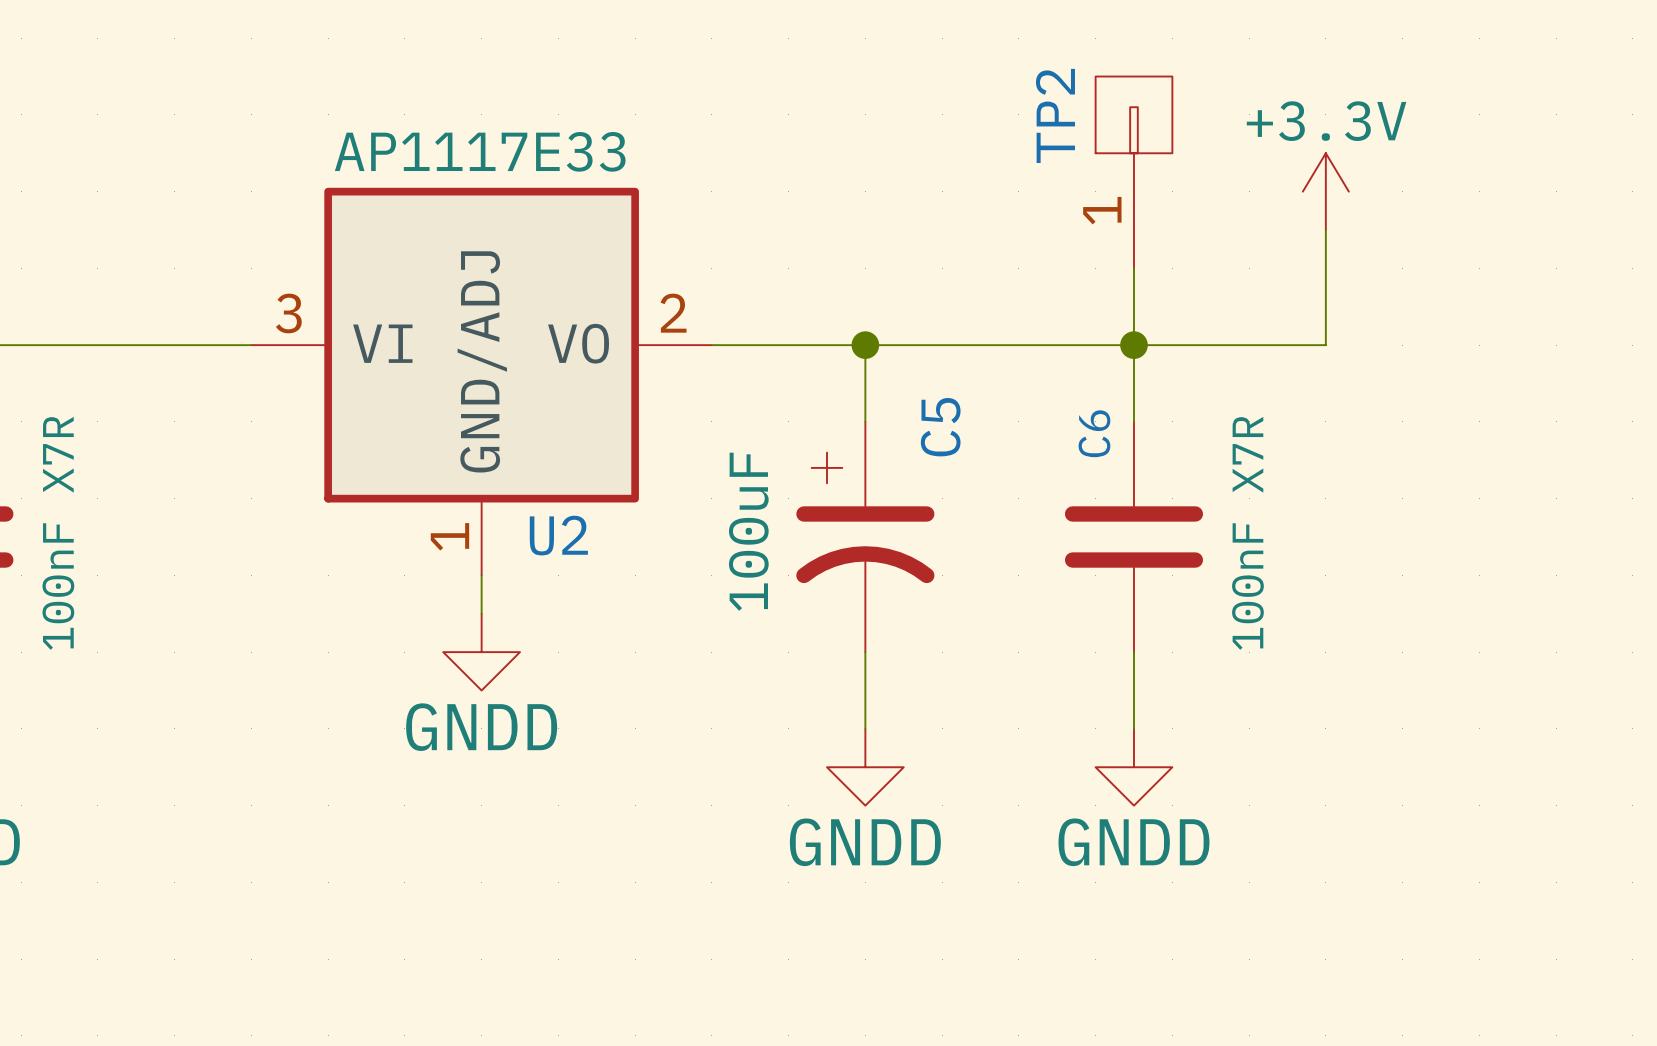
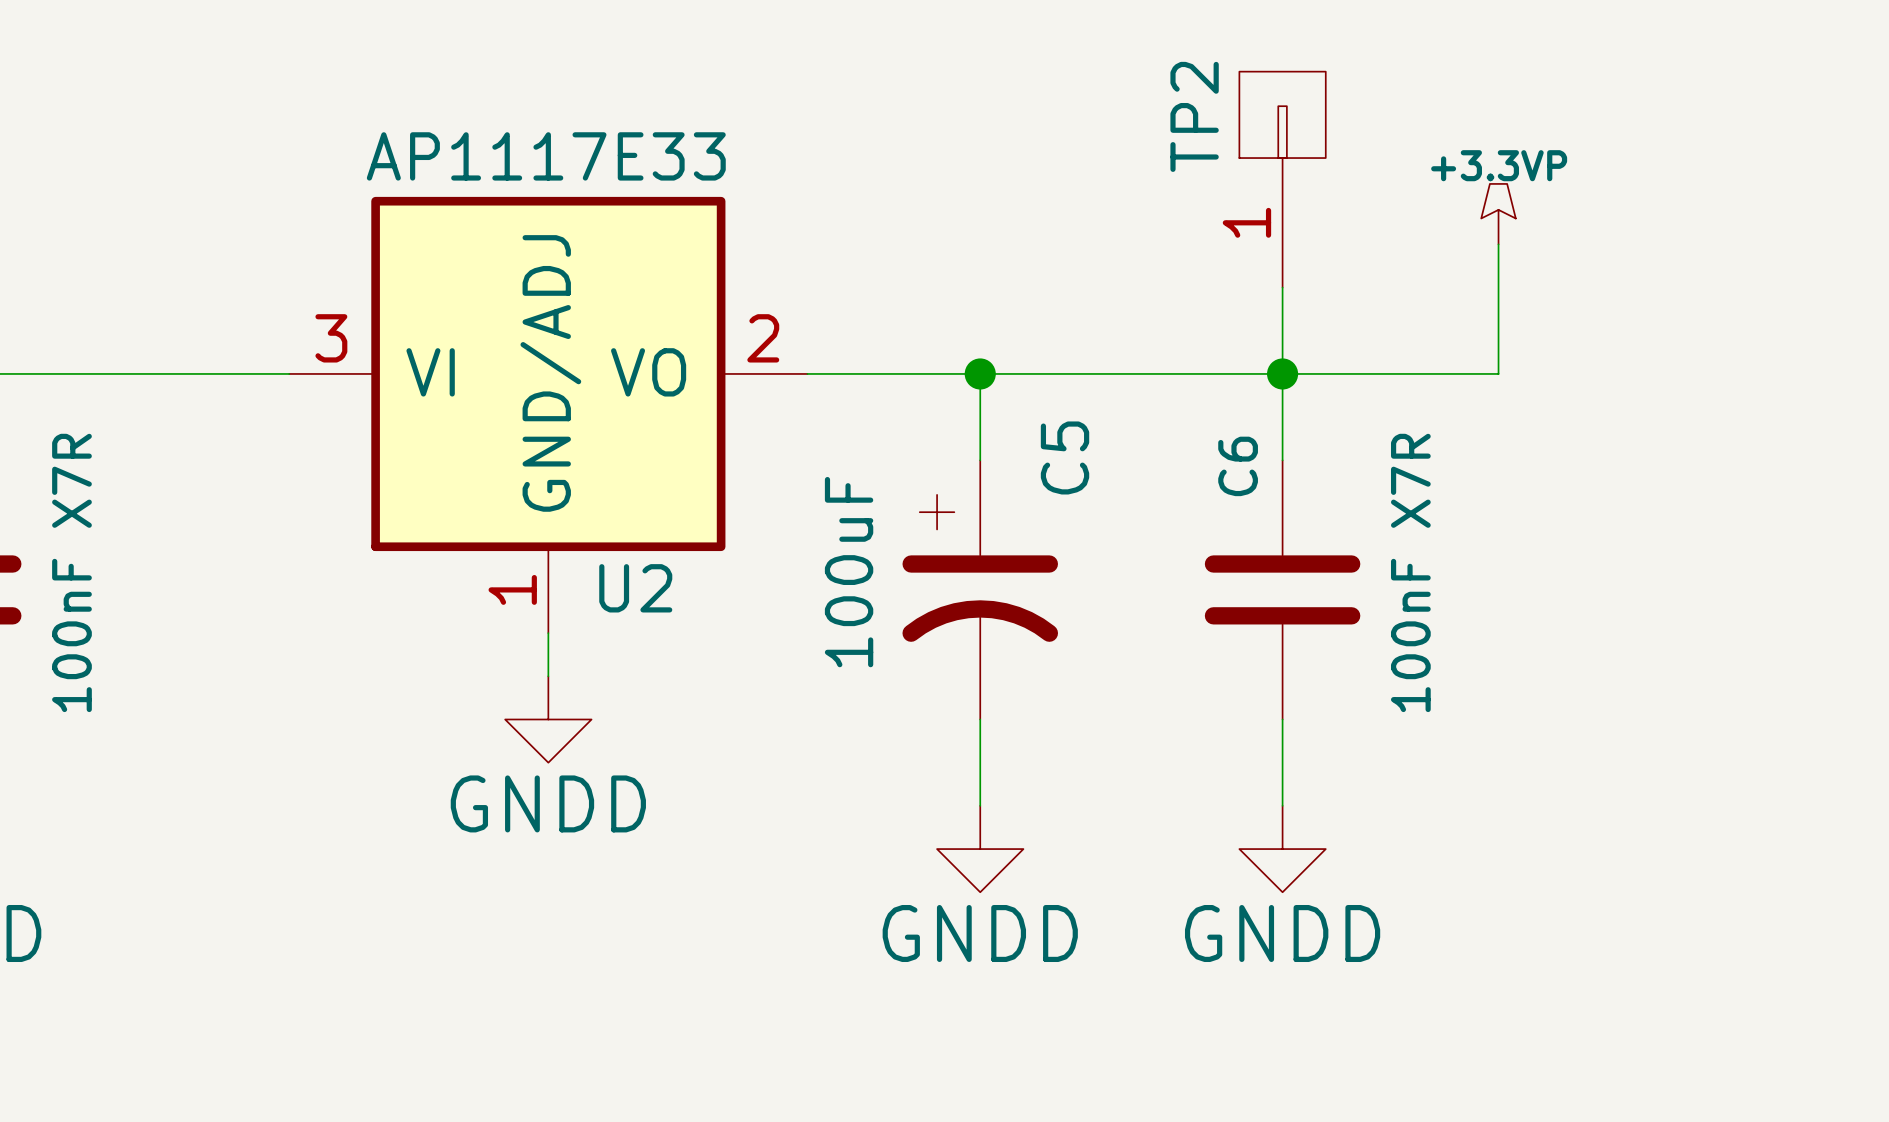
power symbol: +3.3V (1325, 191) -> +3.3VP (1498, 214)

